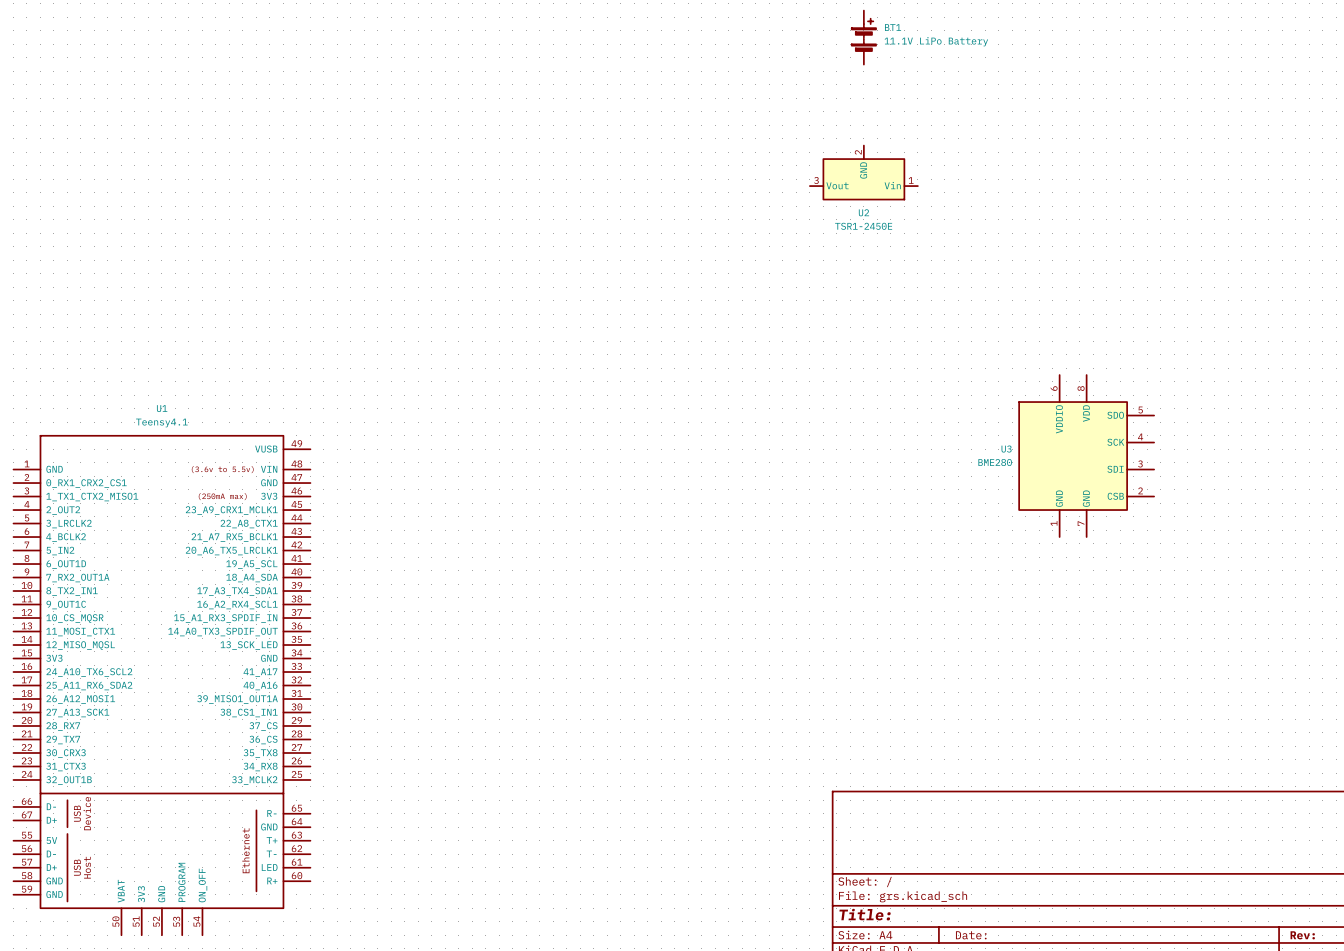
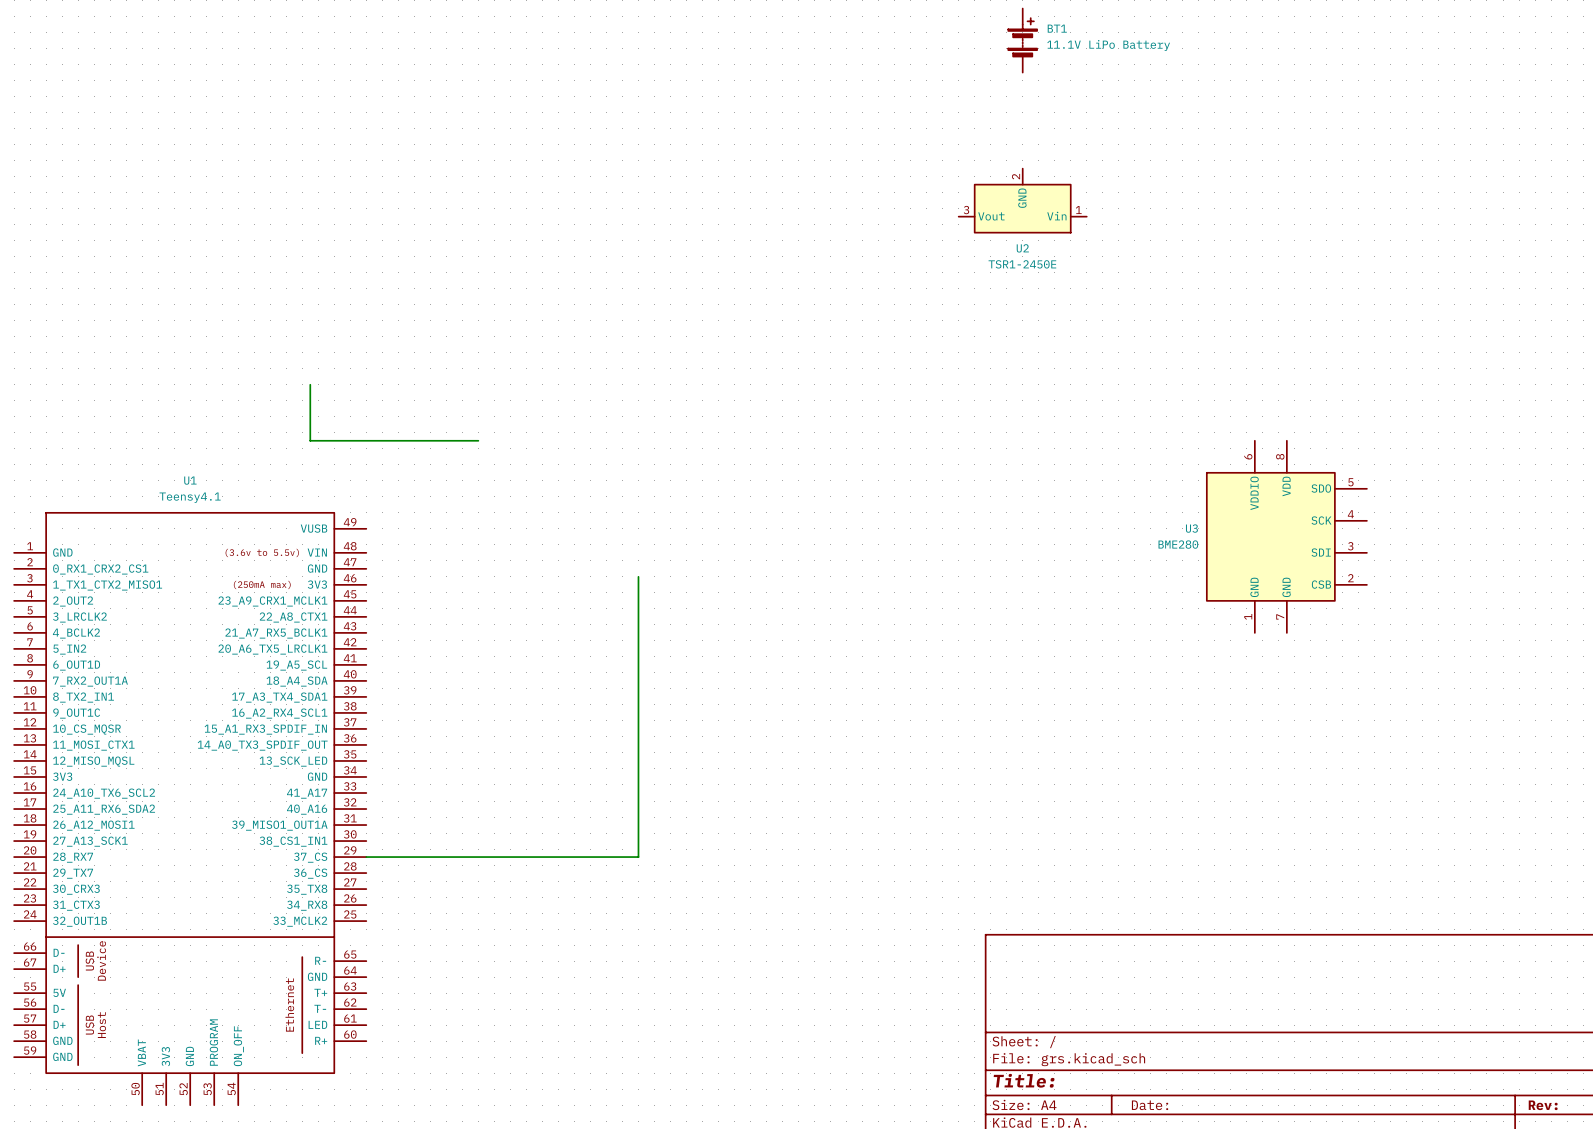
wire: none -> (310, 384) (310, 440) (478, 440)
wire: none -> (638, 576) (638, 857) (366, 857)

